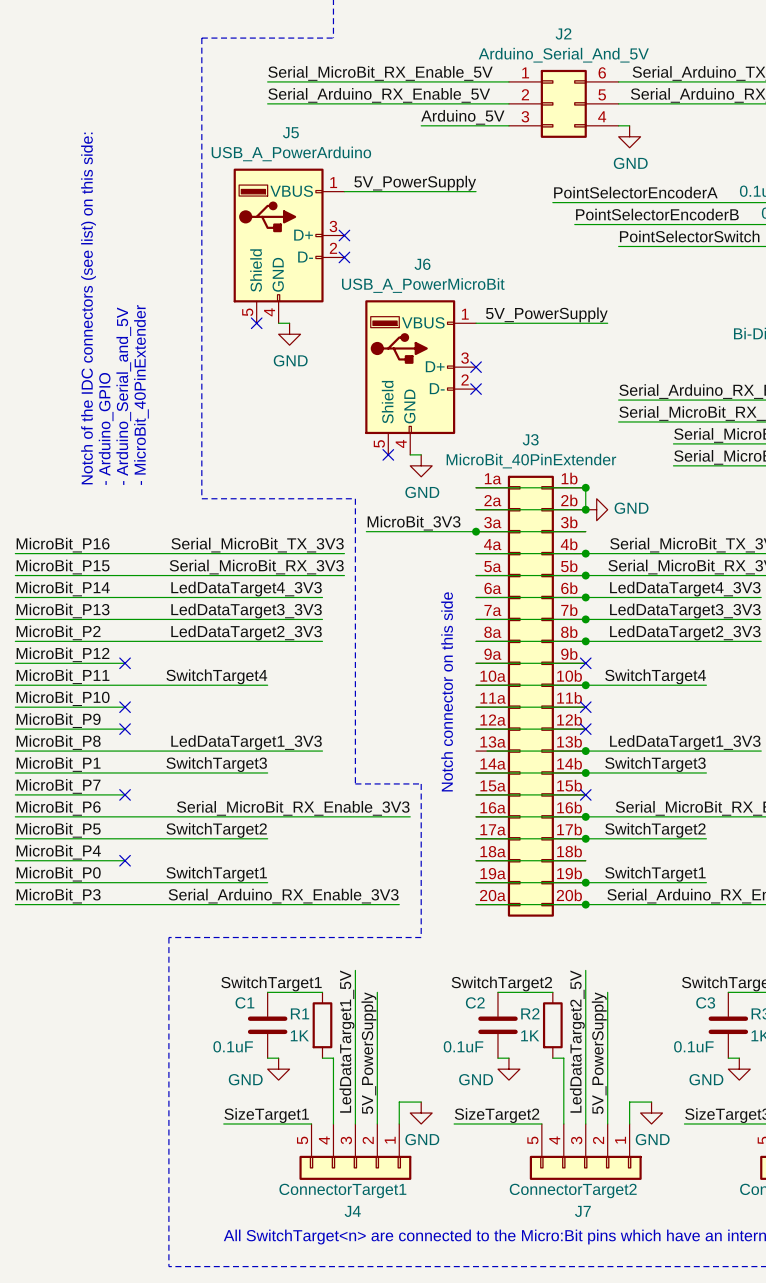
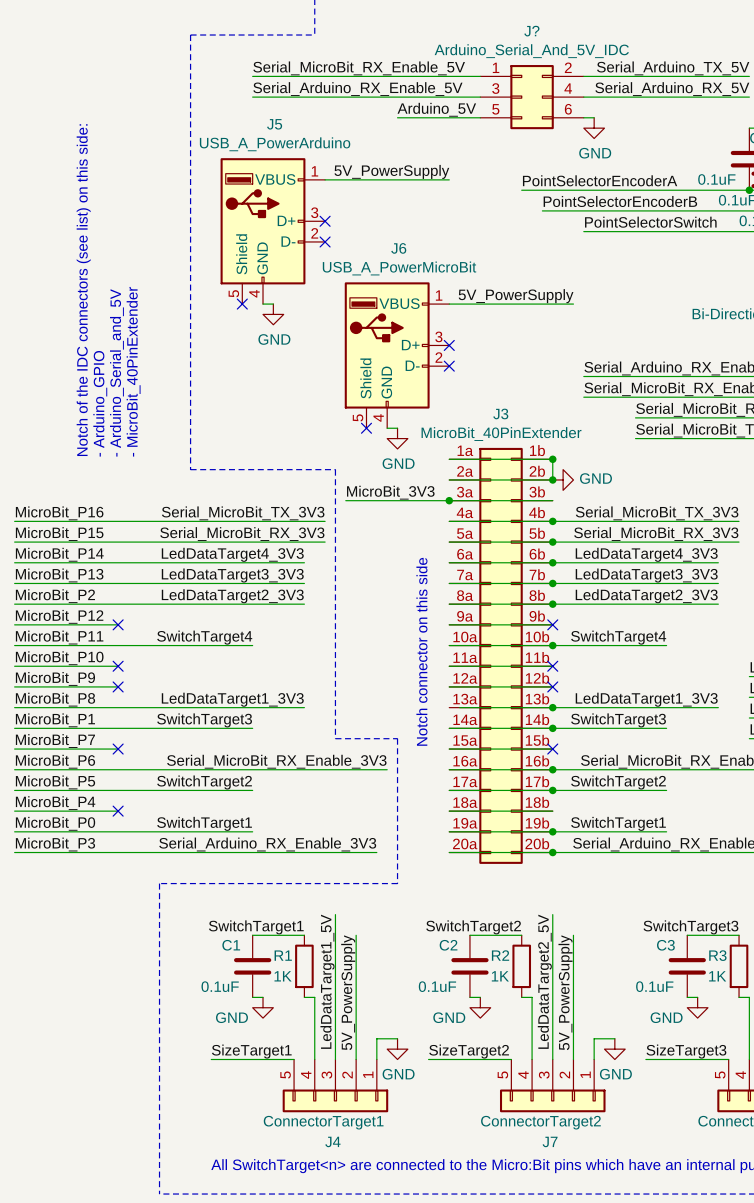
J2 name: J2 (563, 33) -> J? (531, 31)
J2 value: Arduino_Serial_And_5V (563, 55) -> Arduino_Serial_And_5V_IDC (531, 51)
J2 pin number: 6 (602, 72) -> 2 (568, 67)
J2 pin number: 2 (525, 94) -> 3 (495, 88)
J2 pin number: 5 (602, 94) -> 4 (568, 88)
J2 pin number: 3 (525, 116) -> 5 (495, 109)
J2 pin number: 4 (602, 116) -> 6 (568, 109)

